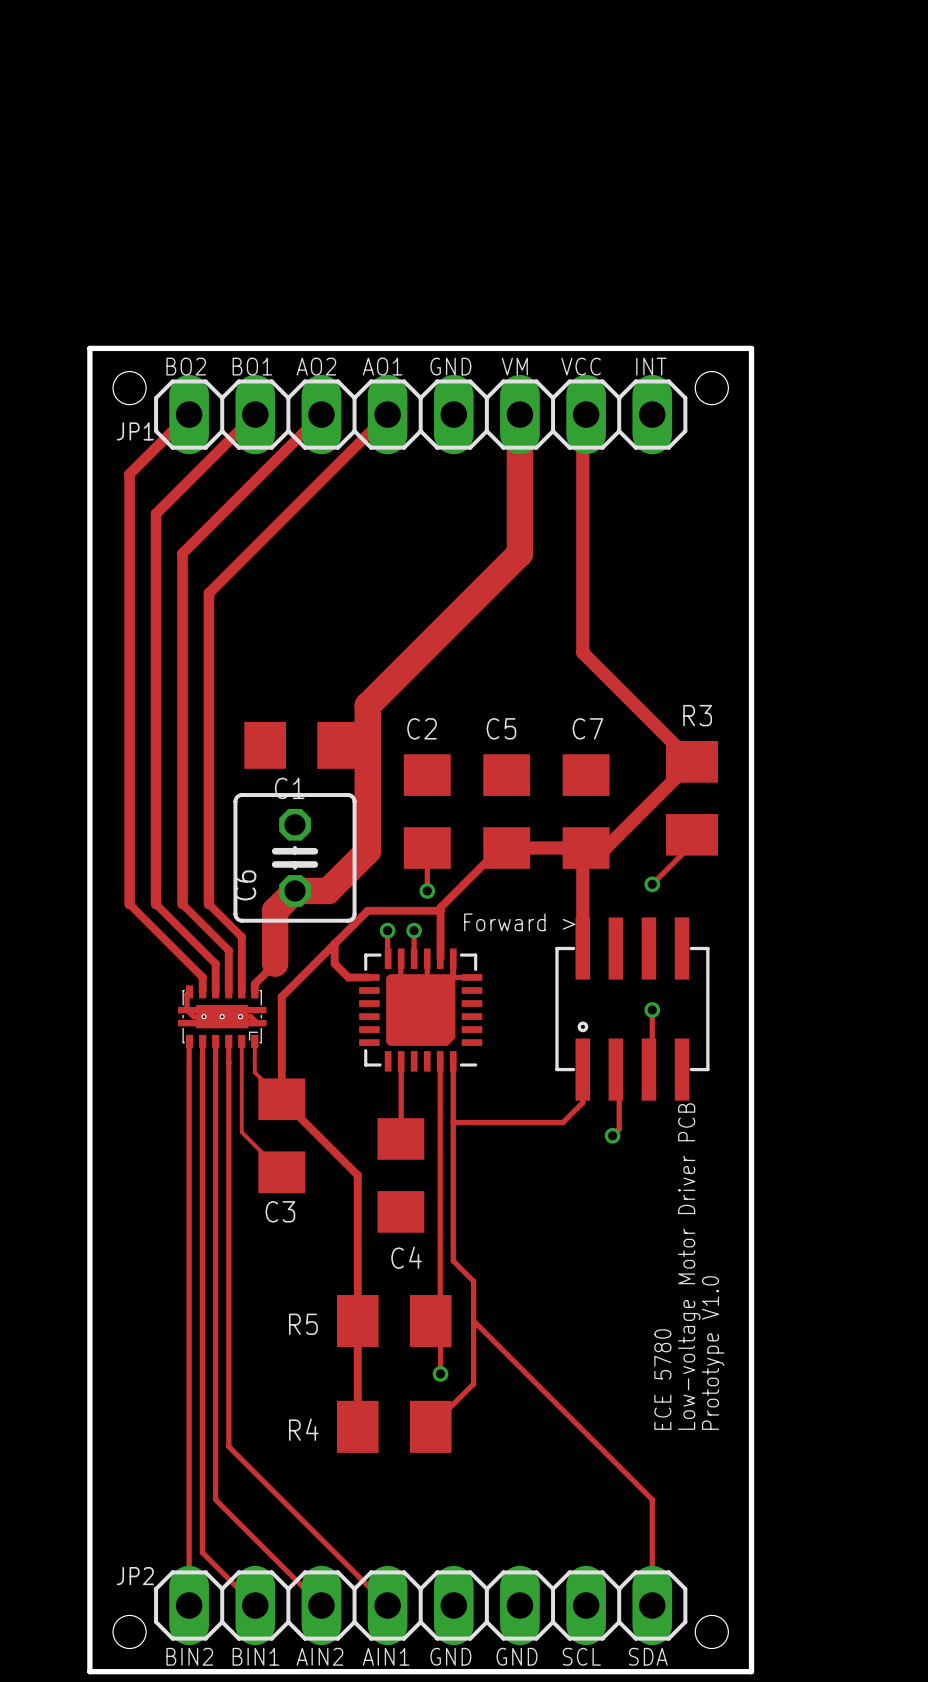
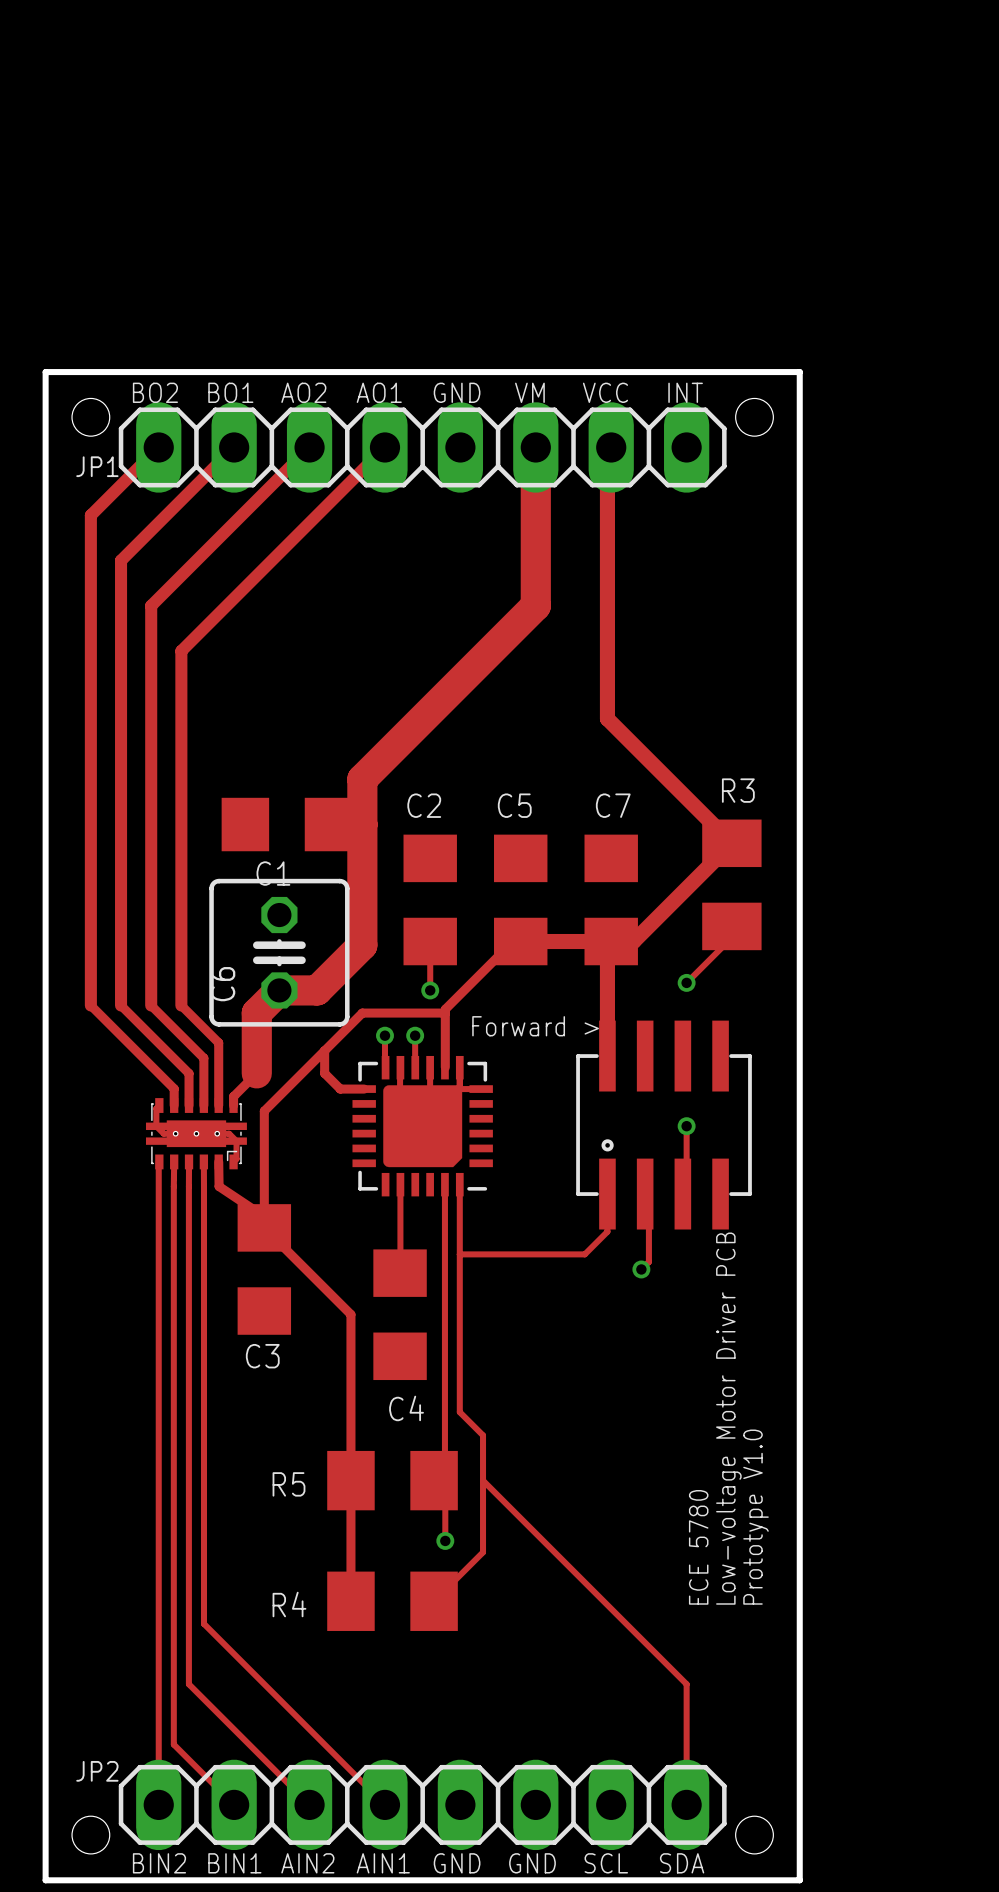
track: (241, 1041) (241, 1132) (281, 1172) -> (218, 1161) (219, 1186) (264, 1216)
track: (254, 1041) (254, 1072) (281, 1099) -> (233, 1161) (236, 1158) (236, 1141)

